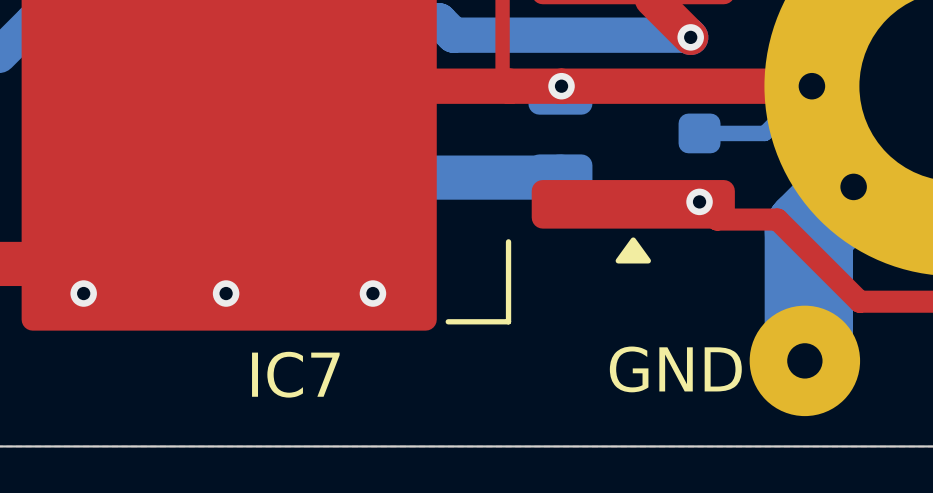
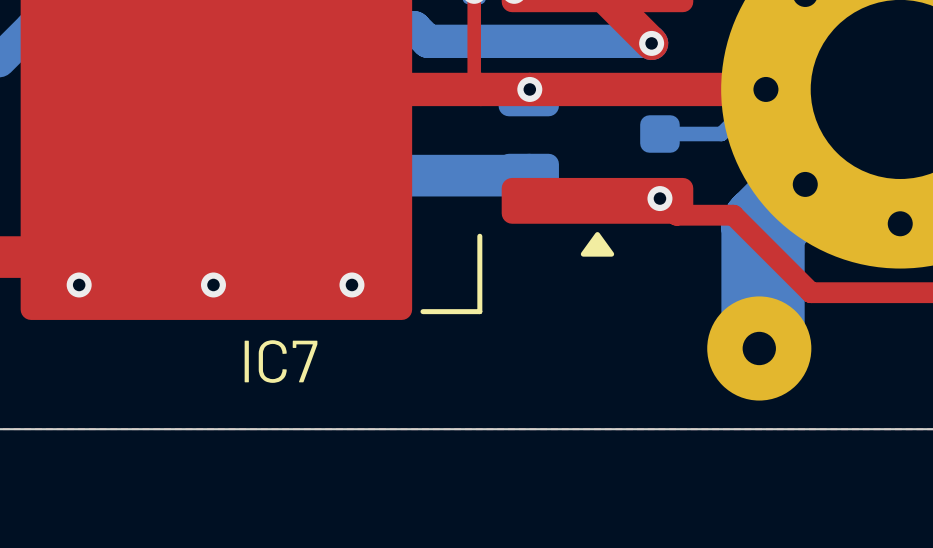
text: GND (675, 369) -> none

